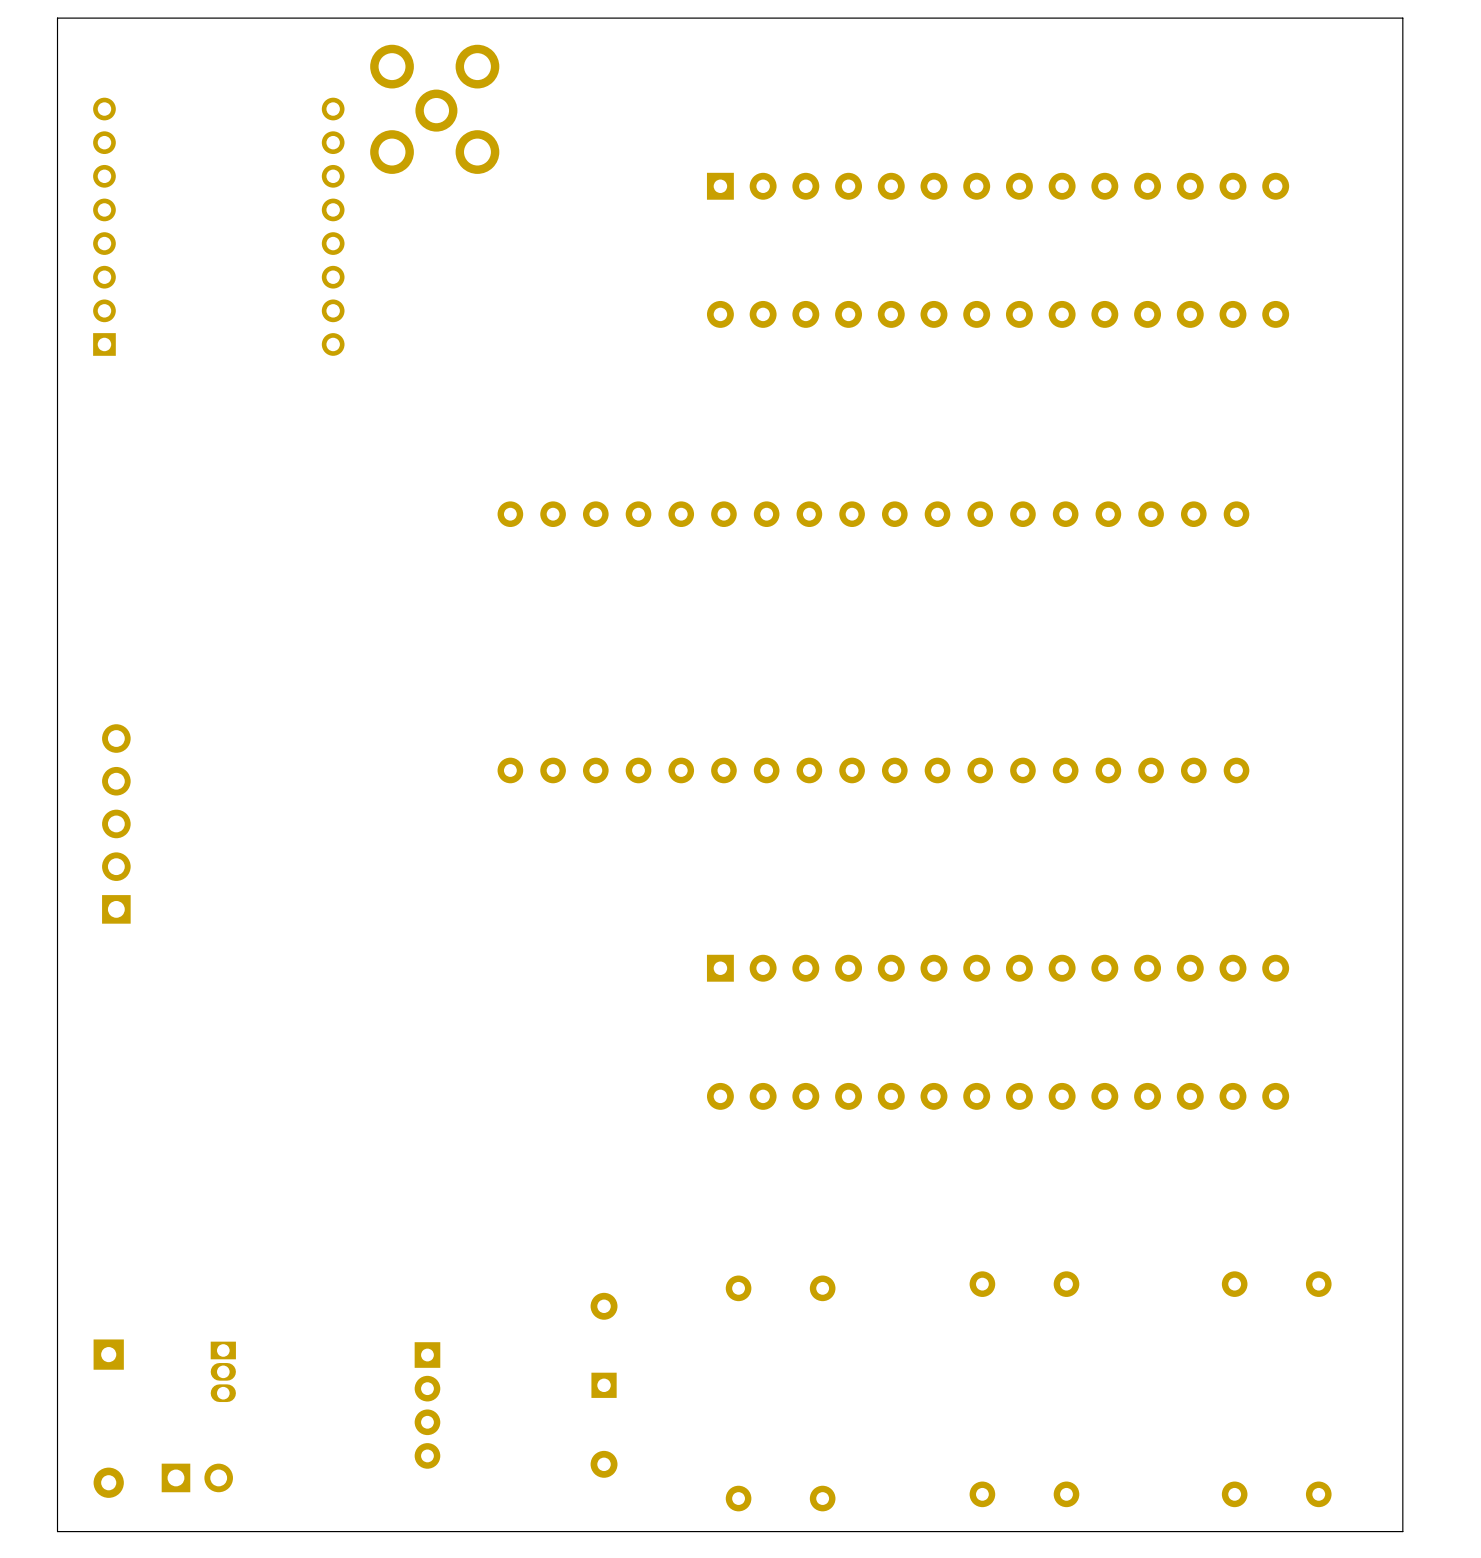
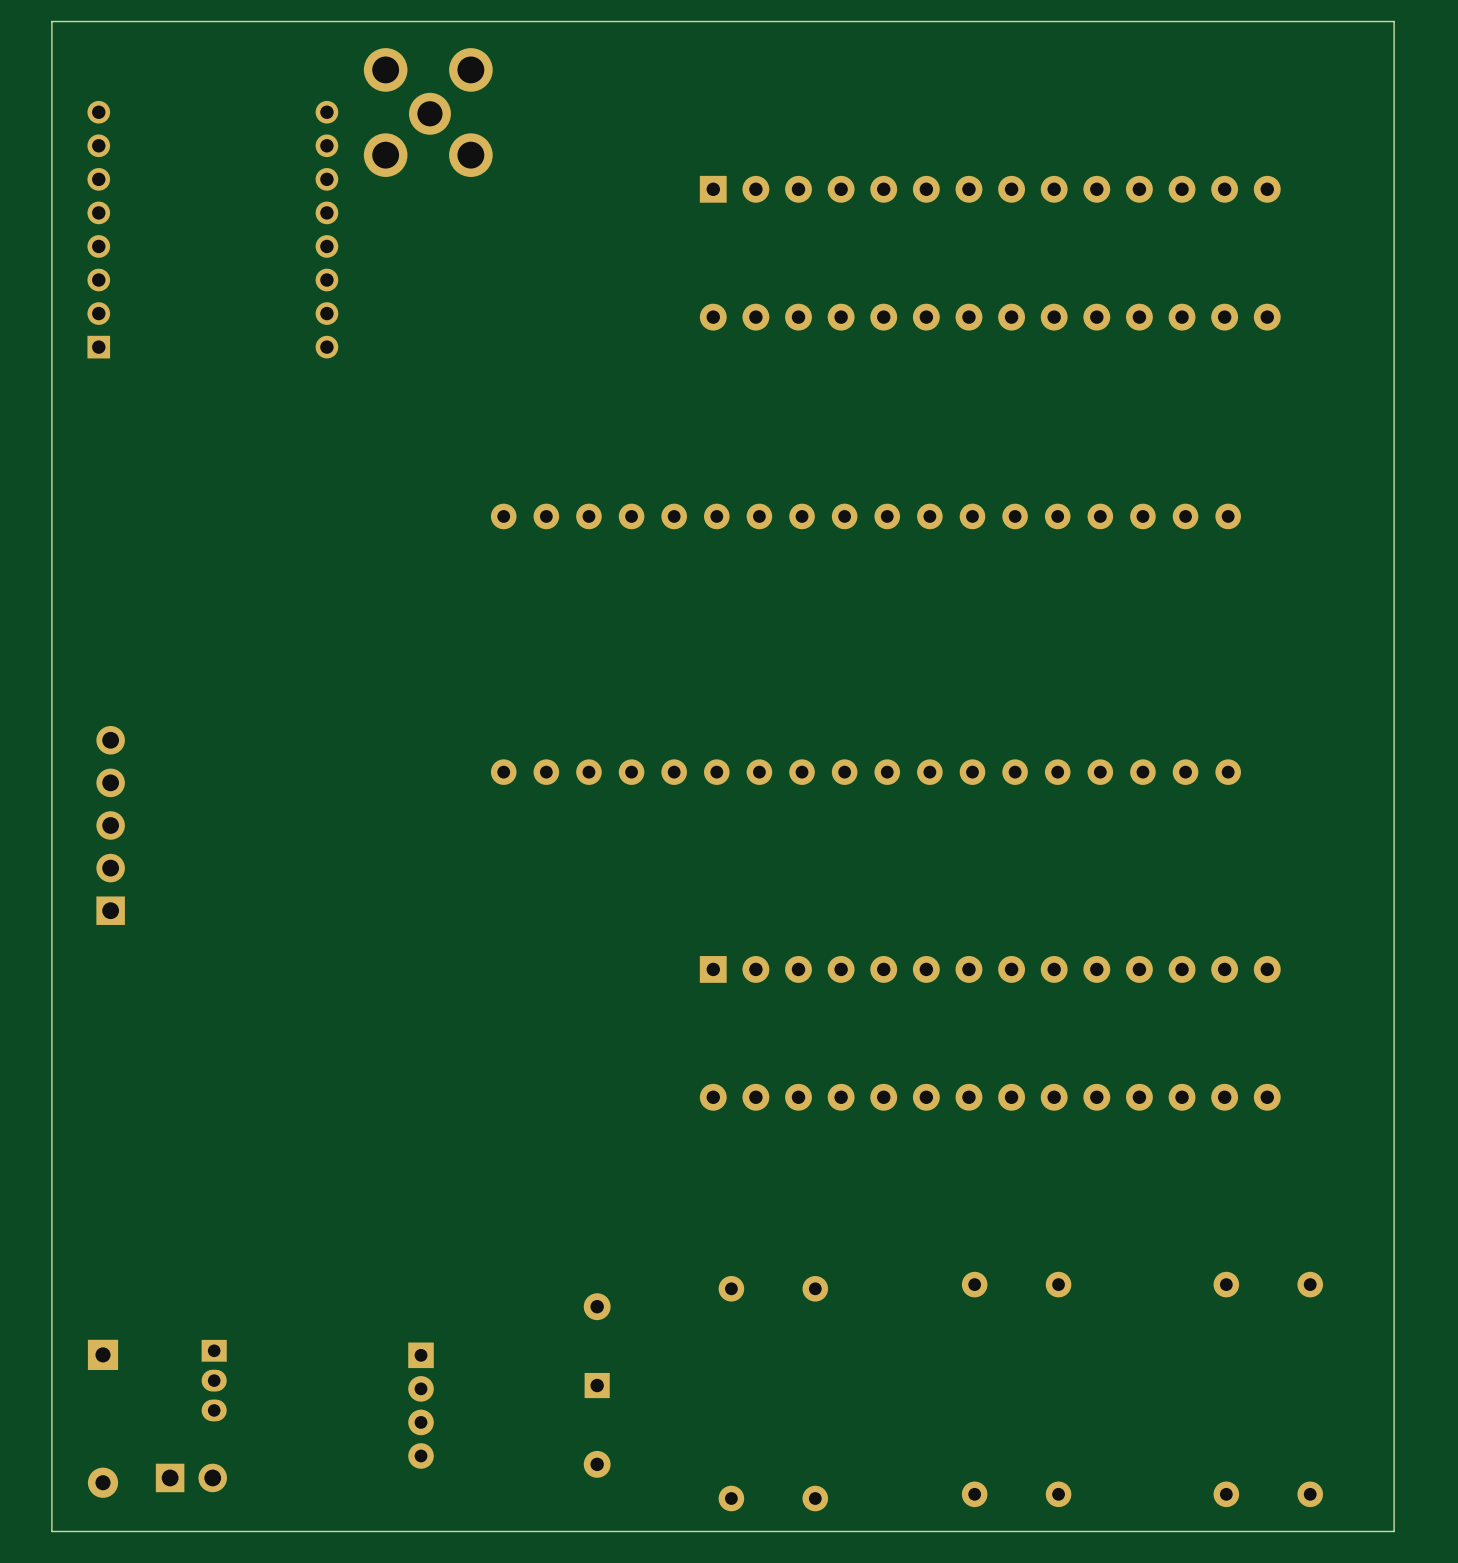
part footprint: [210, 1341, 236, 1403] -> [201, 1339, 227, 1422]

